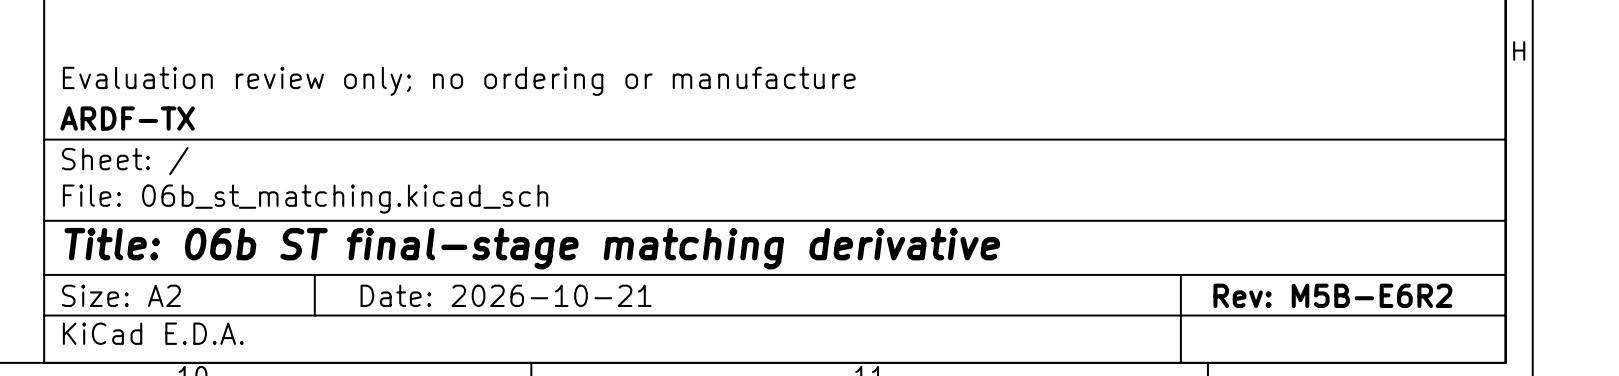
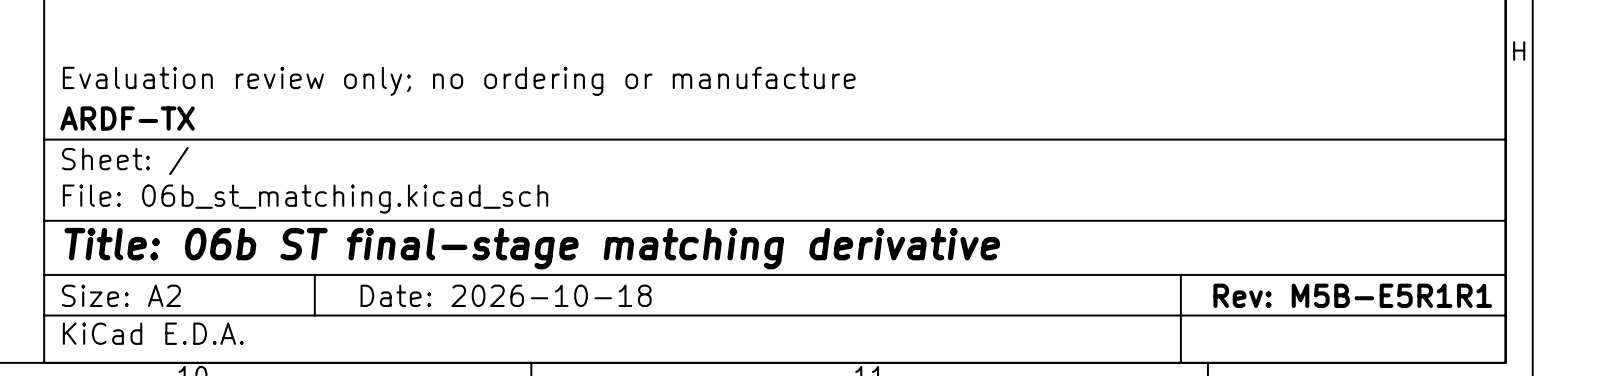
title block: Date: 2026-10-21 (506, 295) -> Date: 2026-10-18 (506, 295)
title block: Rev: M5B-E6R2 (1332, 295) -> Rev: M5B-E5R1R1 (1352, 295)

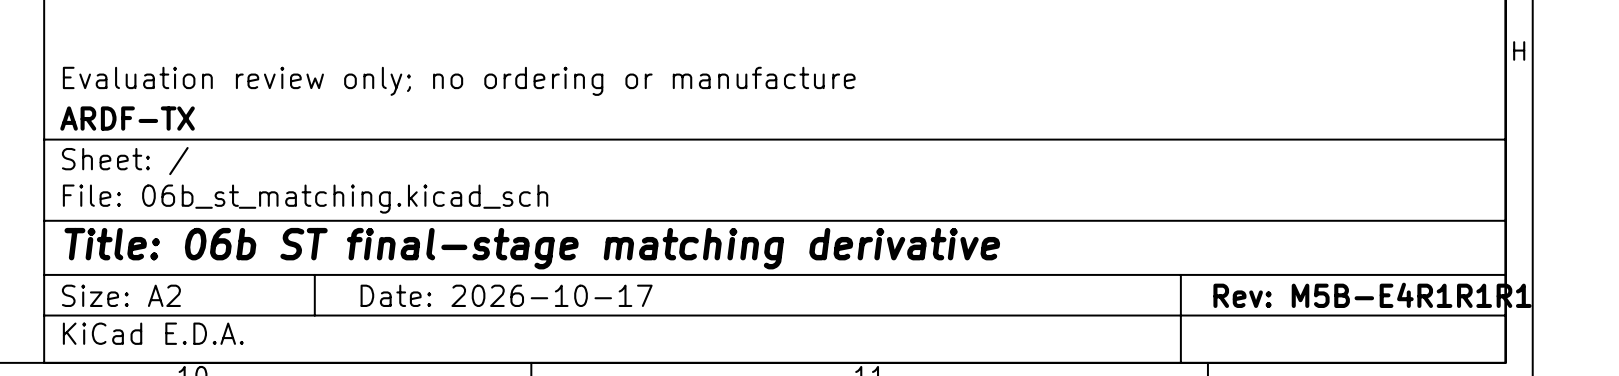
title block: Date: 2026-10-18 (506, 295) -> Date: 2026-10-17 (506, 295)
title block: Rev: M5B-E5R1R1 (1352, 295) -> Rev: M5B-E4R1R1R1 (1372, 295)

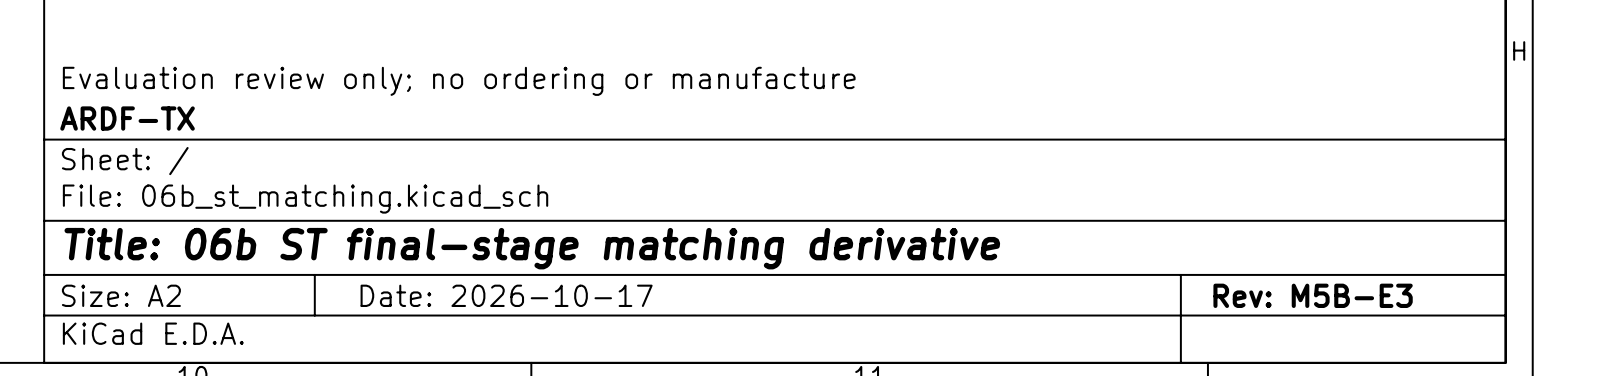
title block: Rev: M5B-E4R1R1R1 (1372, 295) -> Rev: M5B-E3 (1313, 295)

